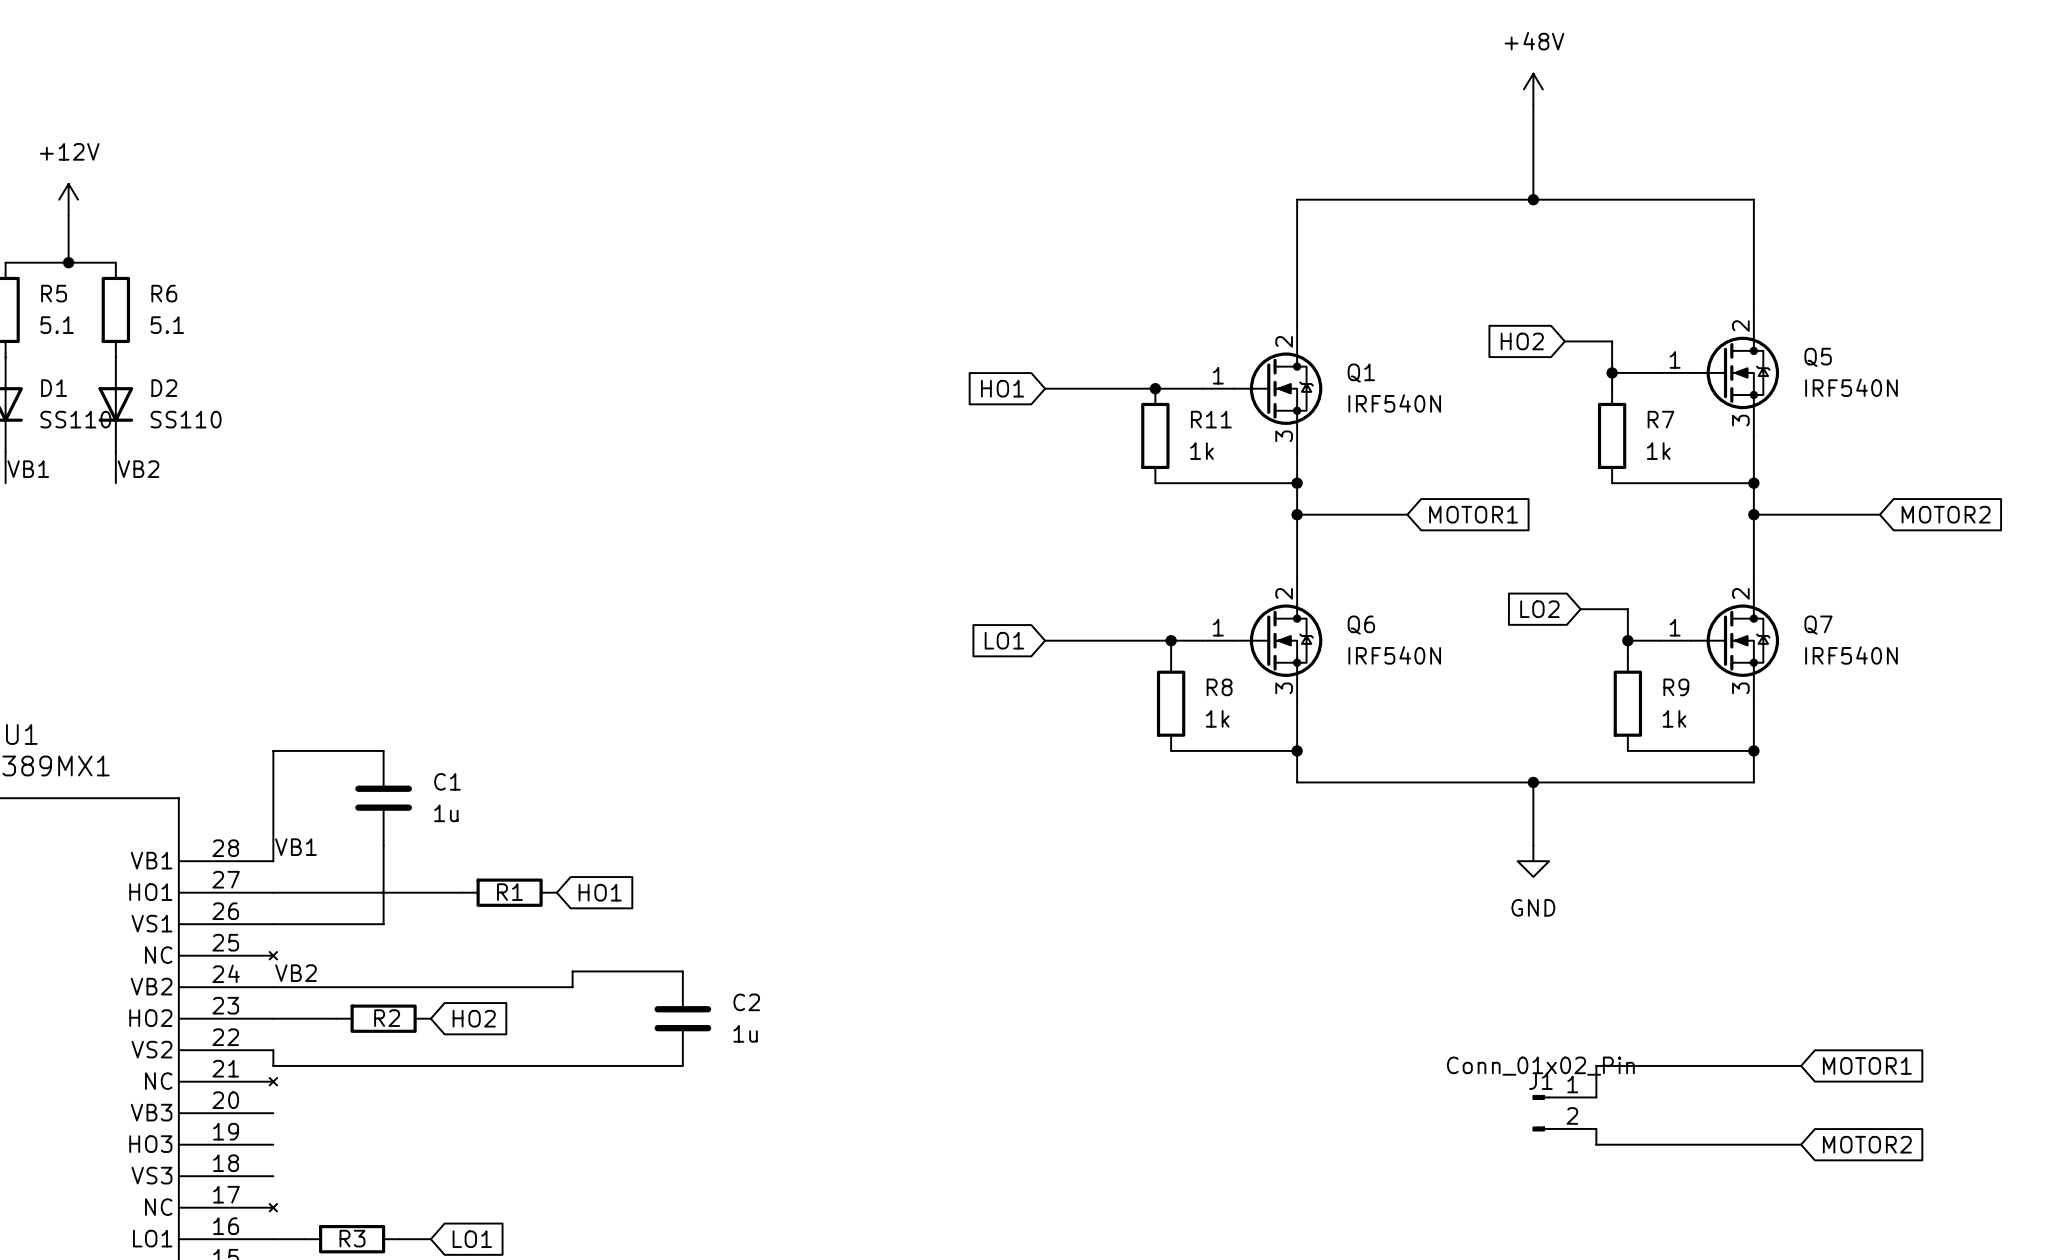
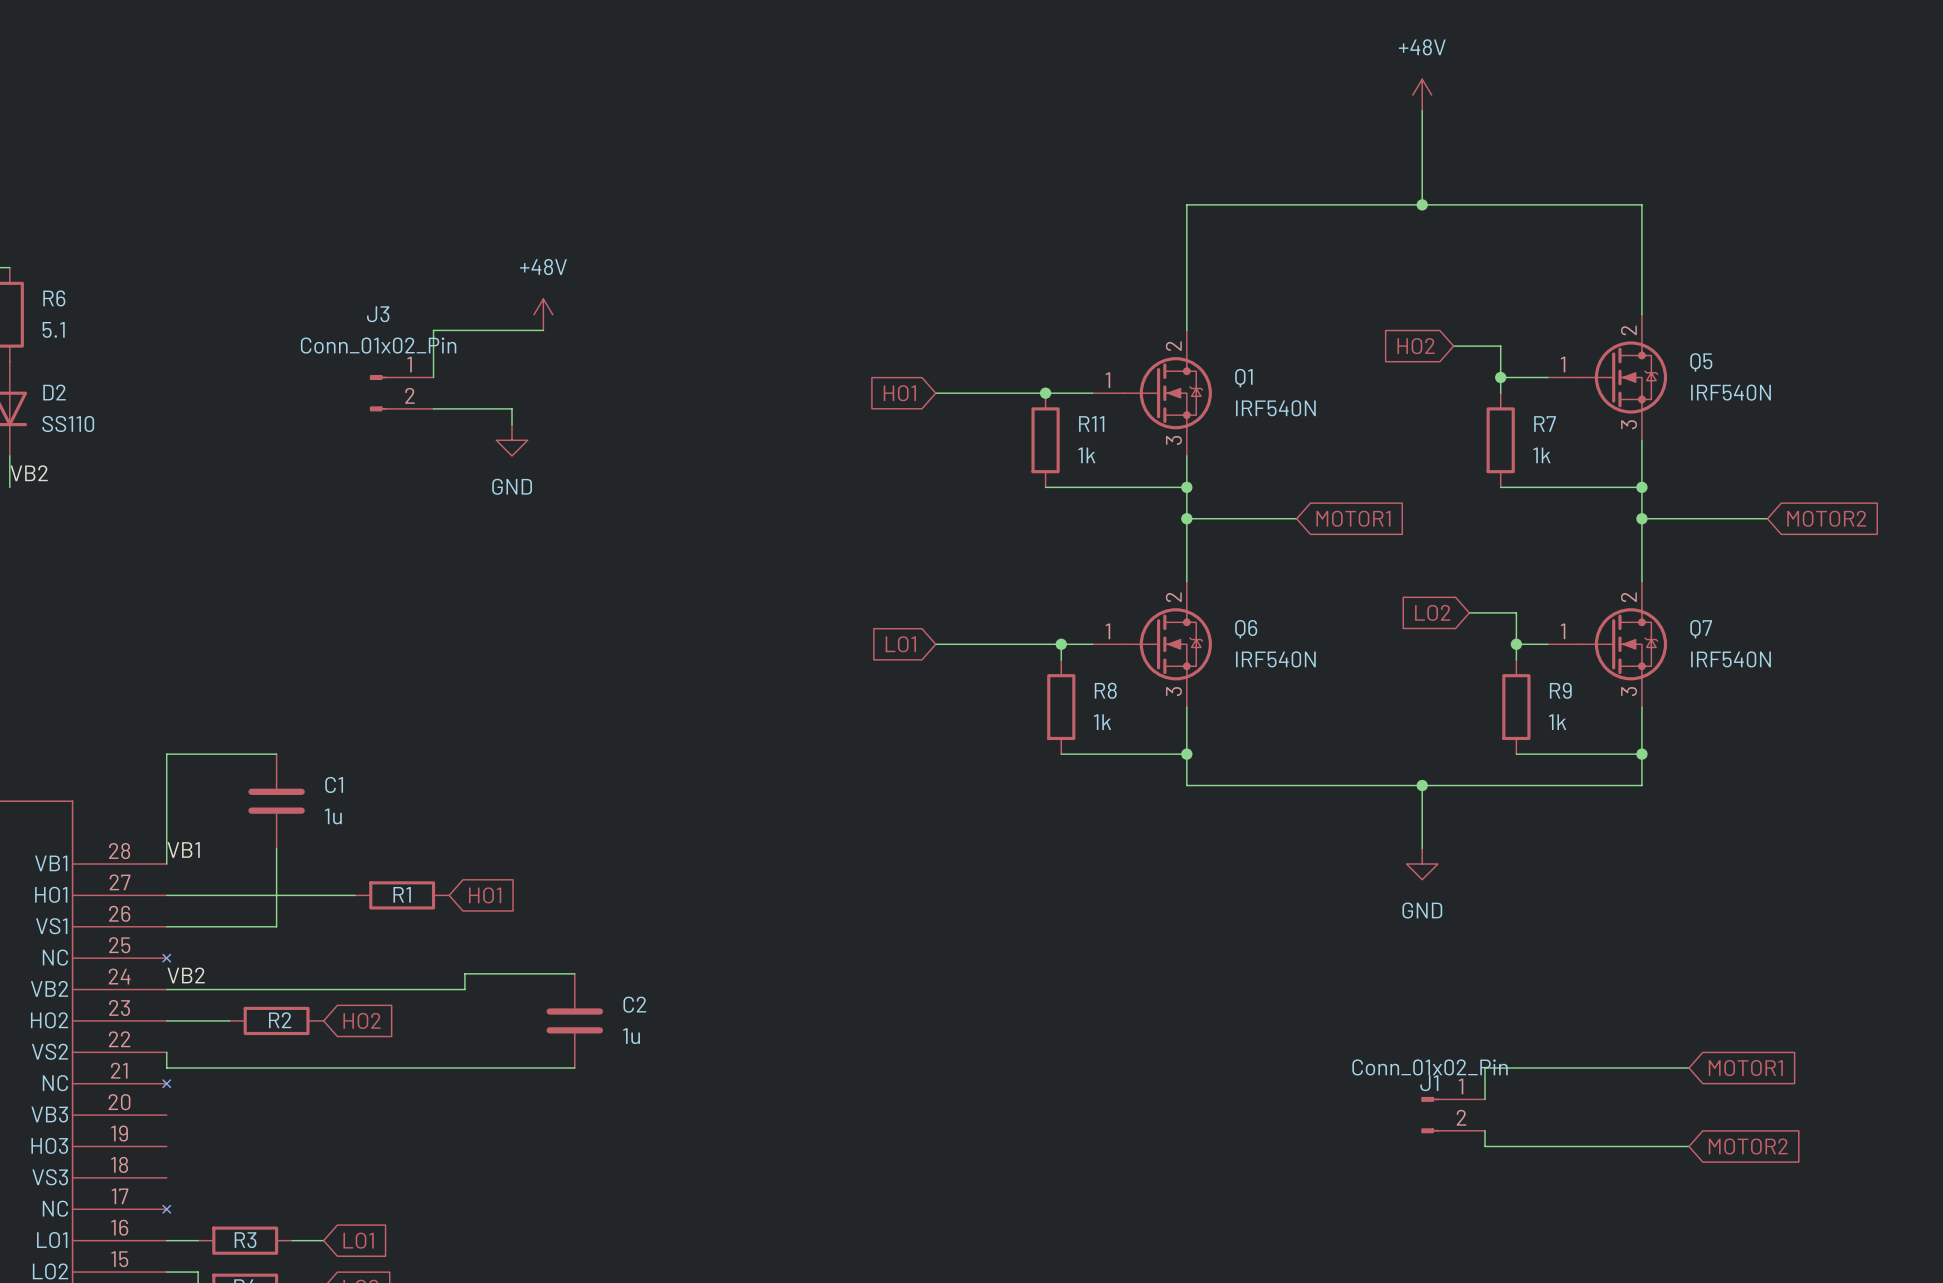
power symbol: none -> +48V (543, 314)
wire: none -> (543, 330) (433, 330) (433, 377)
J3: none -> Conn_01x02_Pin (401, 393)
wire: none -> (433, 408) (512, 408) (512, 424)
power symbol: none -> GND (512, 440)

